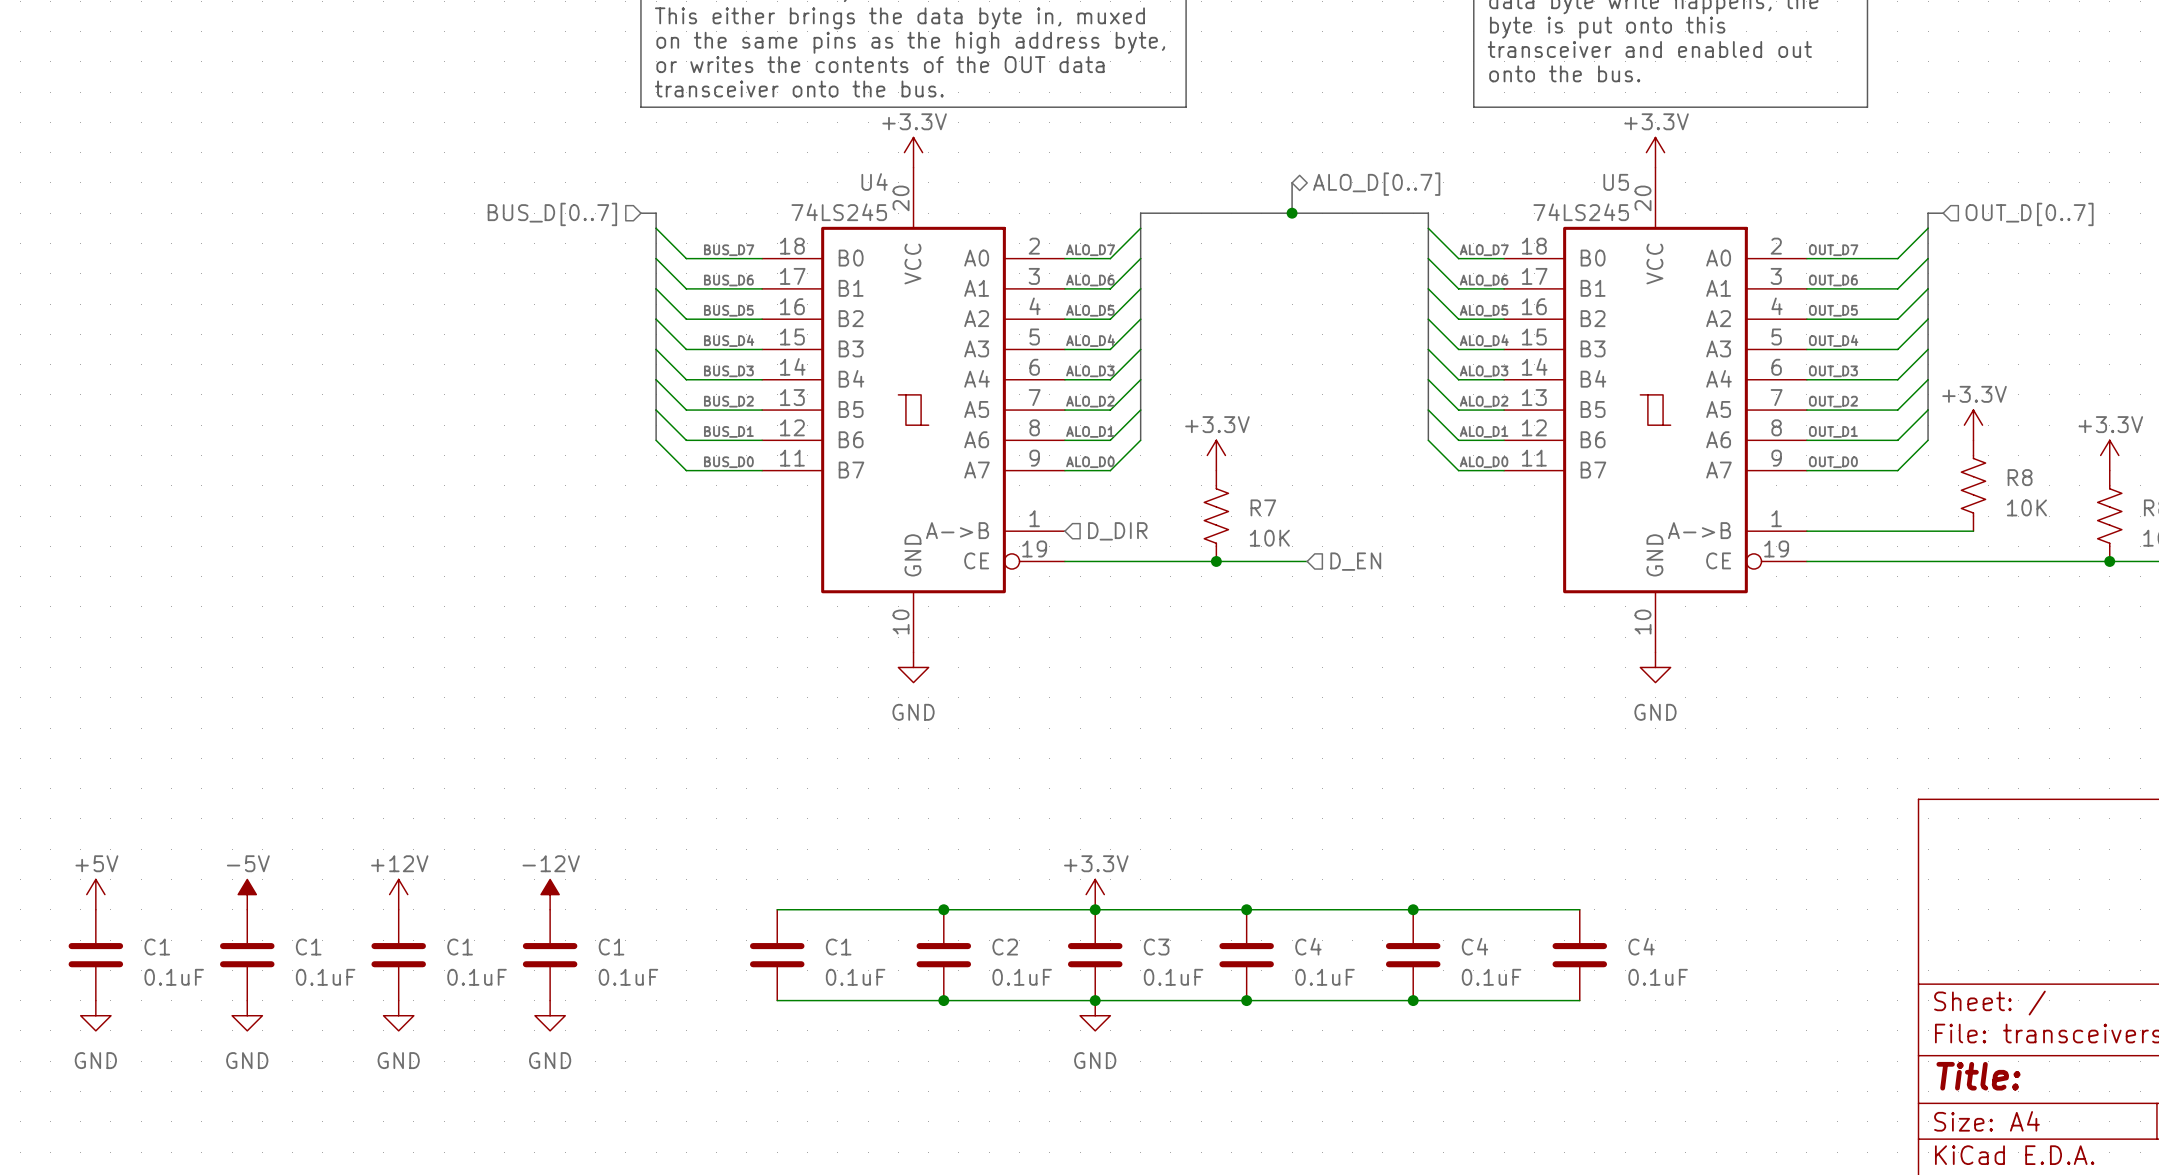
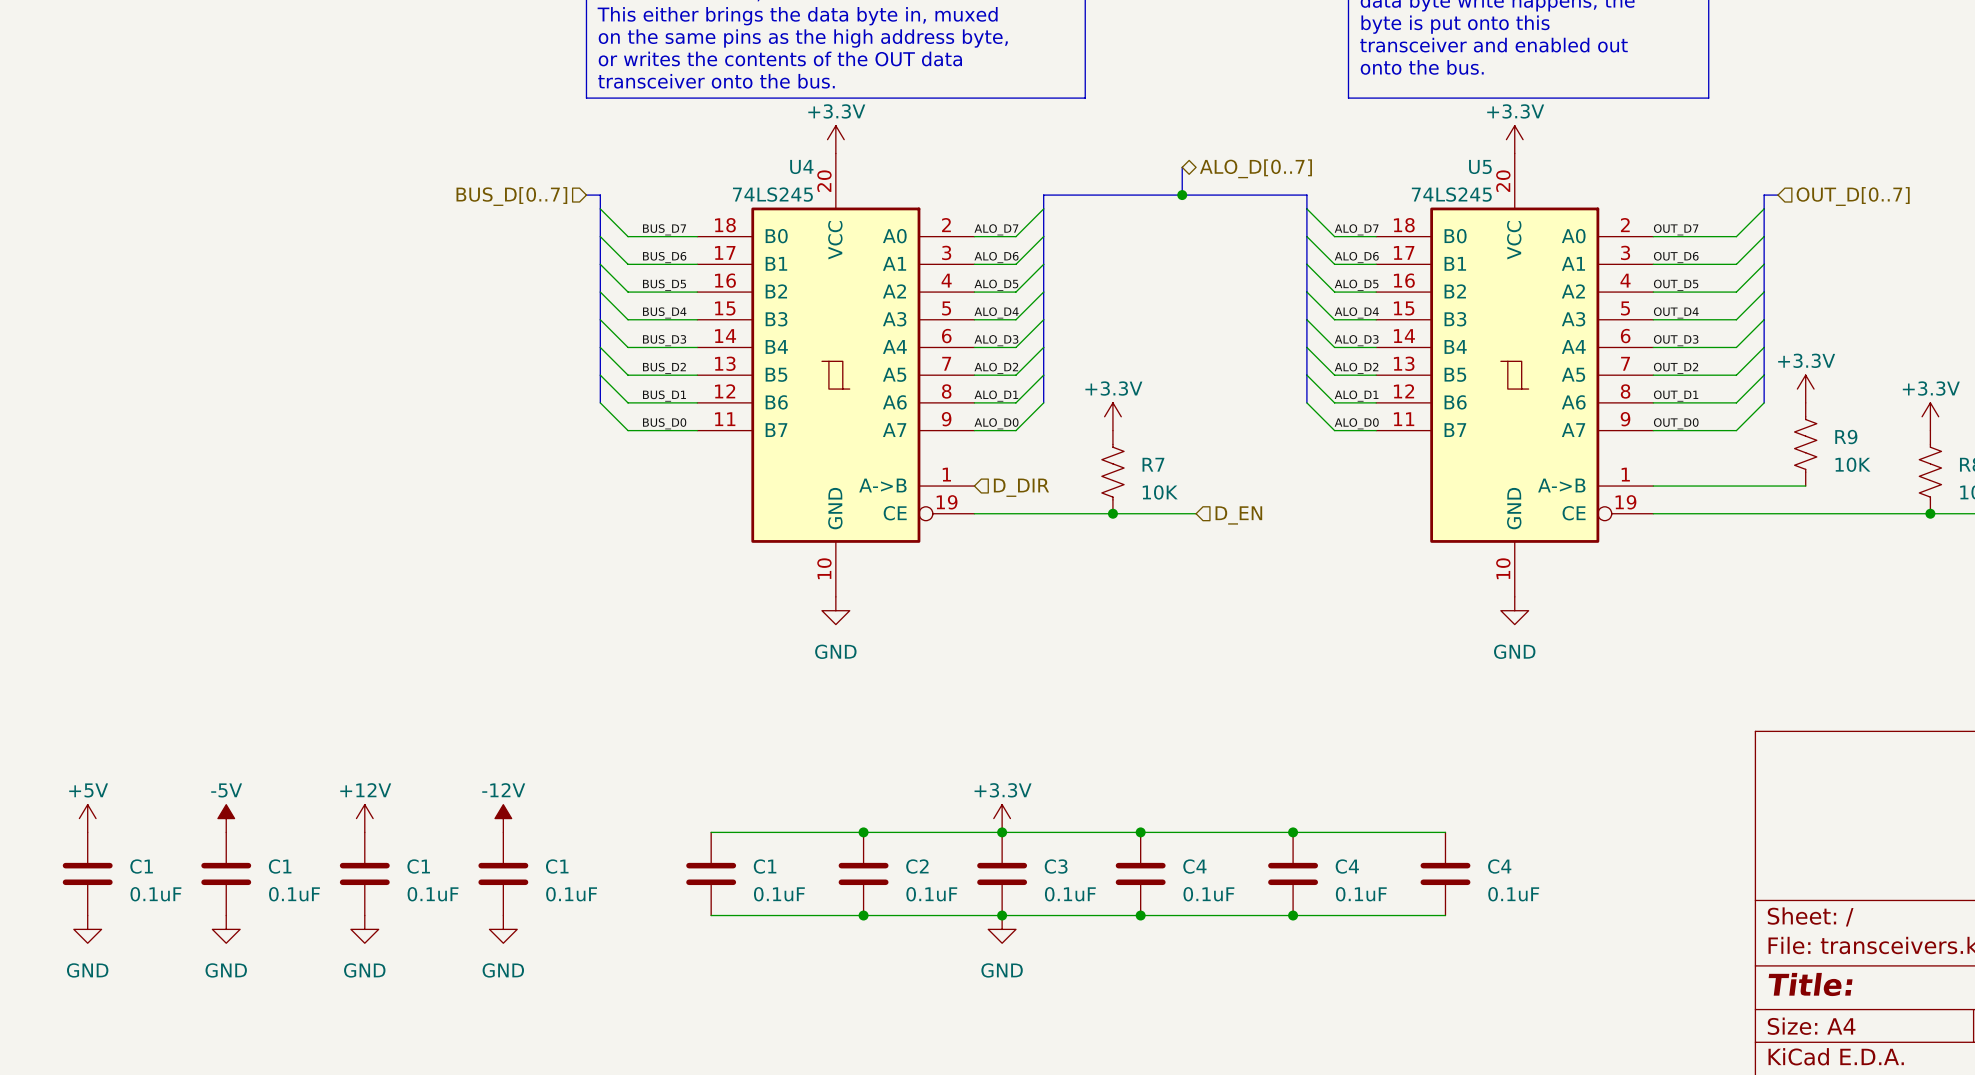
R8 name: R8 (2020, 477) -> R9 (1846, 437)

